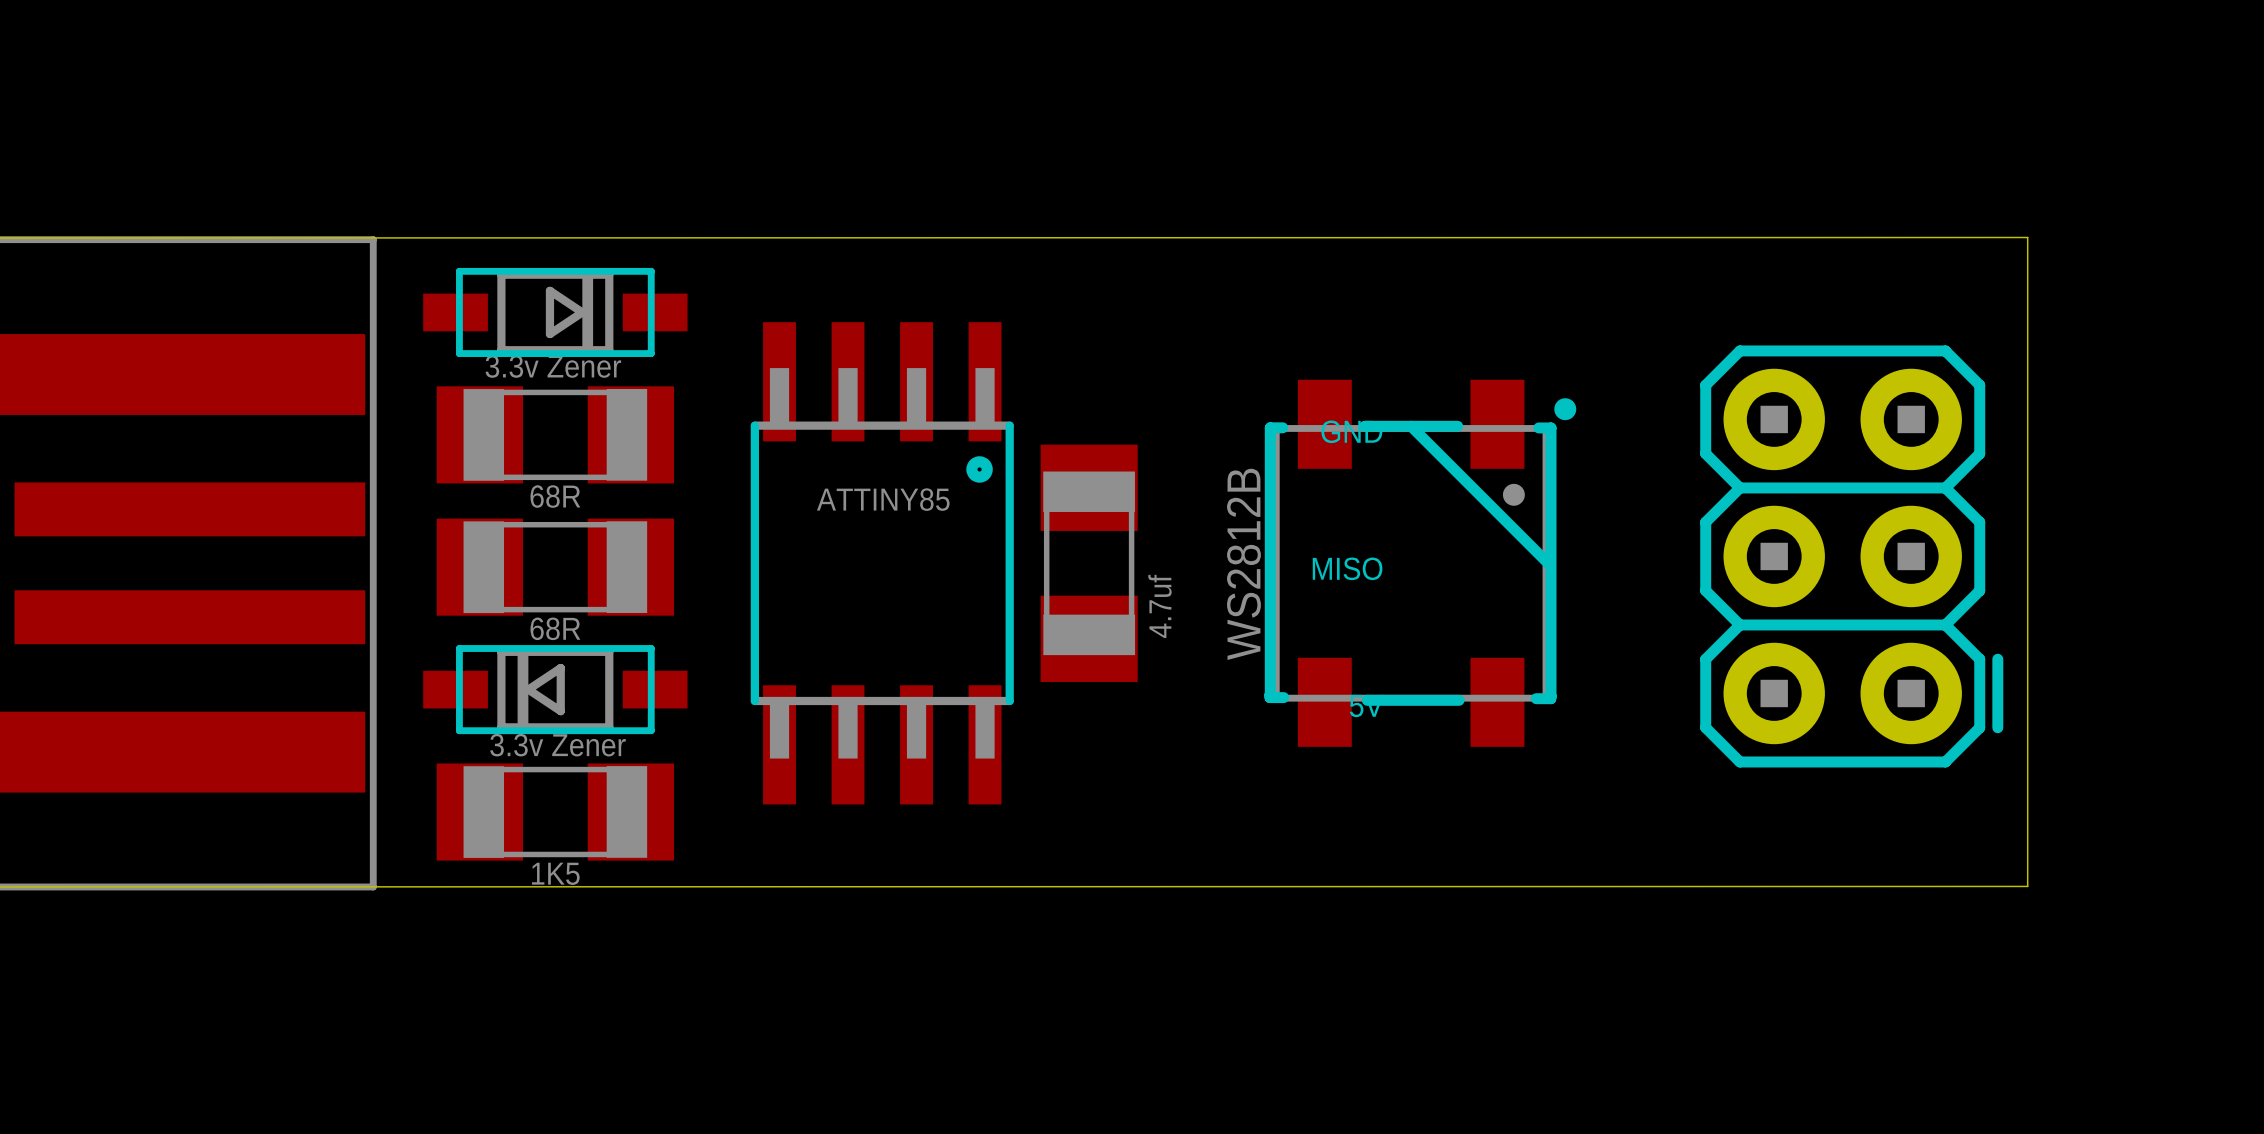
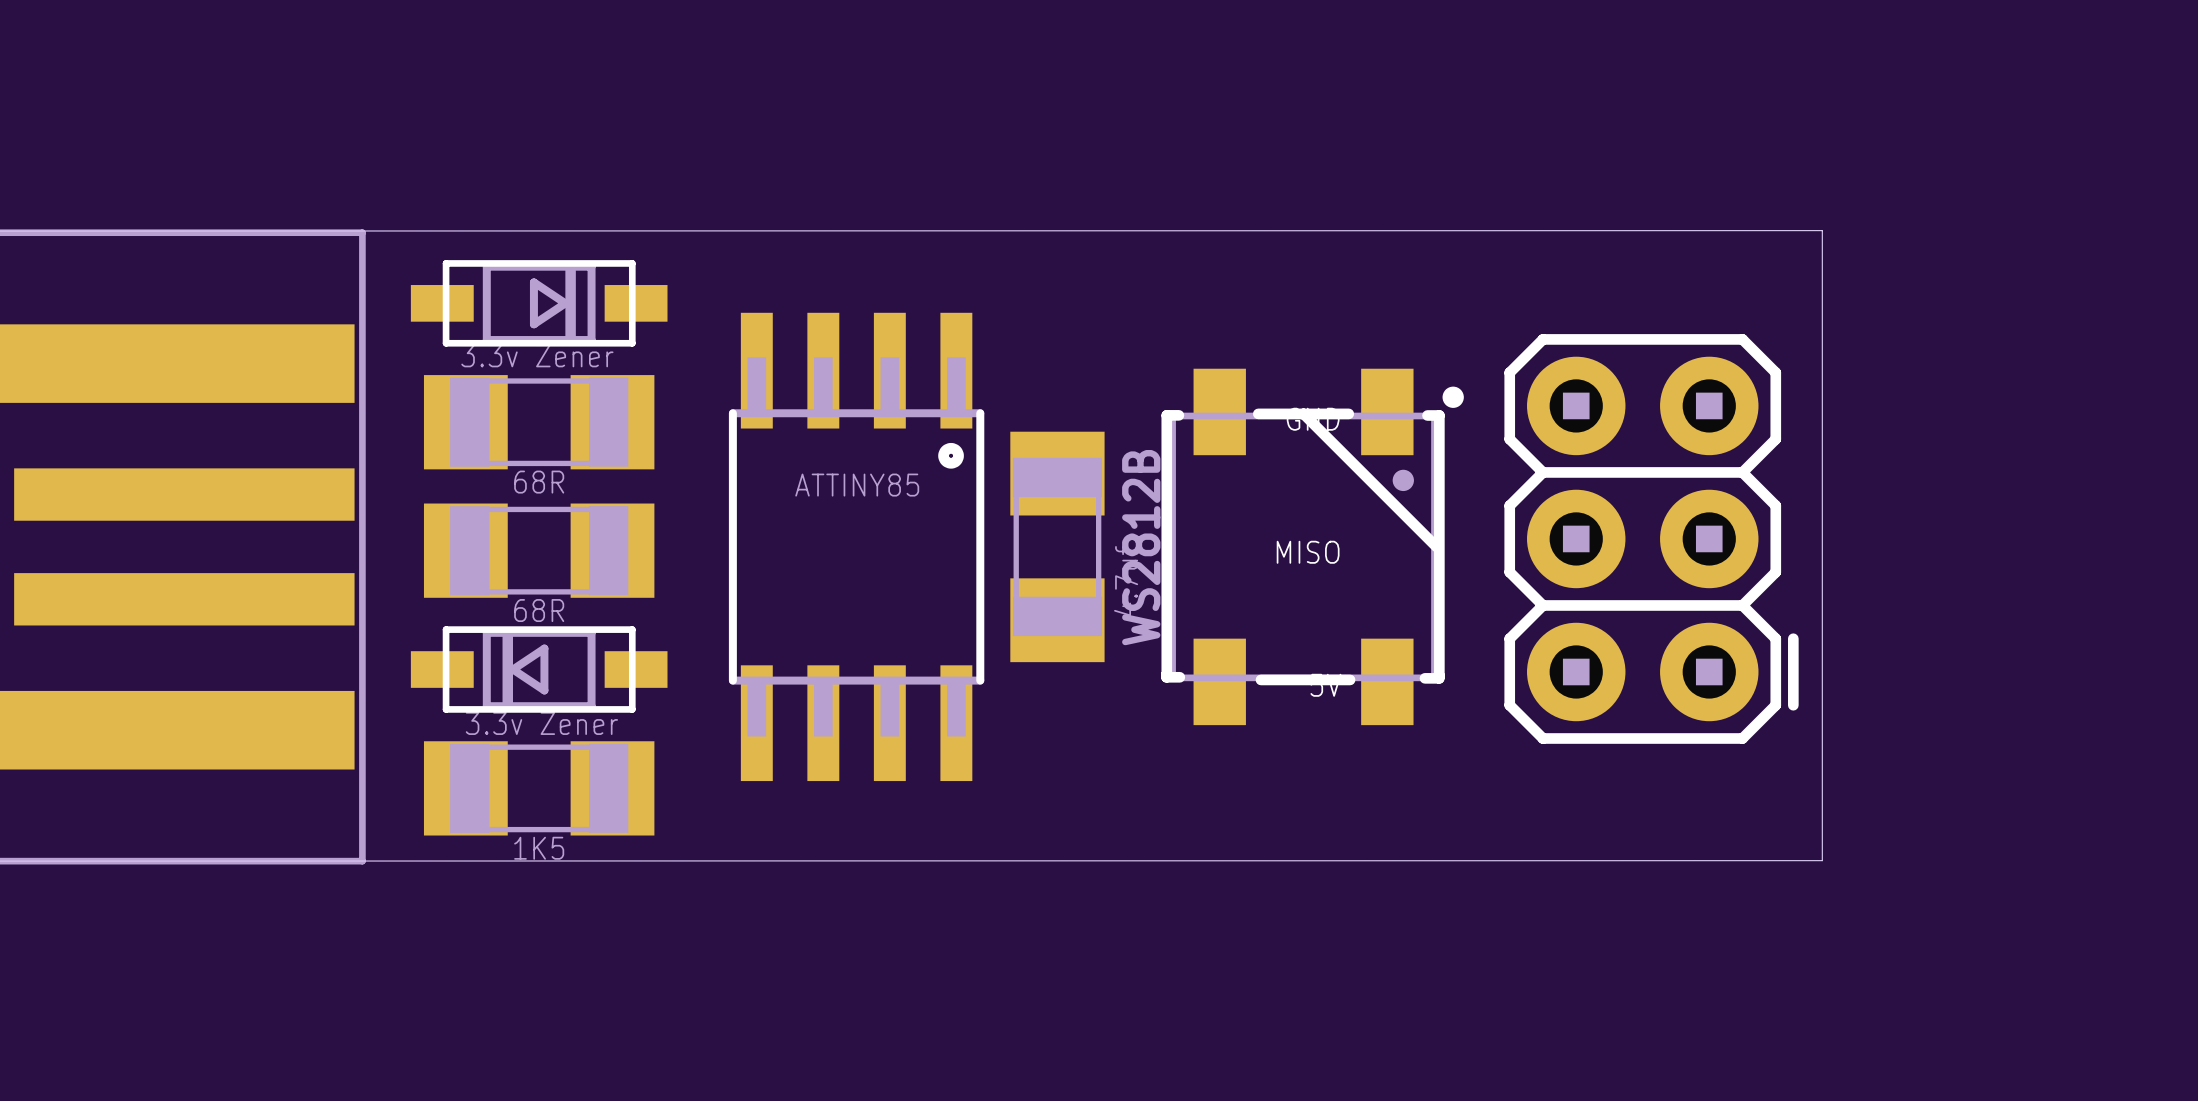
board edge: (1876, 237) (2027, 237) (2027, 886) (1876, 886) -> (1822, 230) (1822, 860)
part position: (1851, 556) -> (1651, 538)
part position: (1420, 563) -> (1312, 546)

